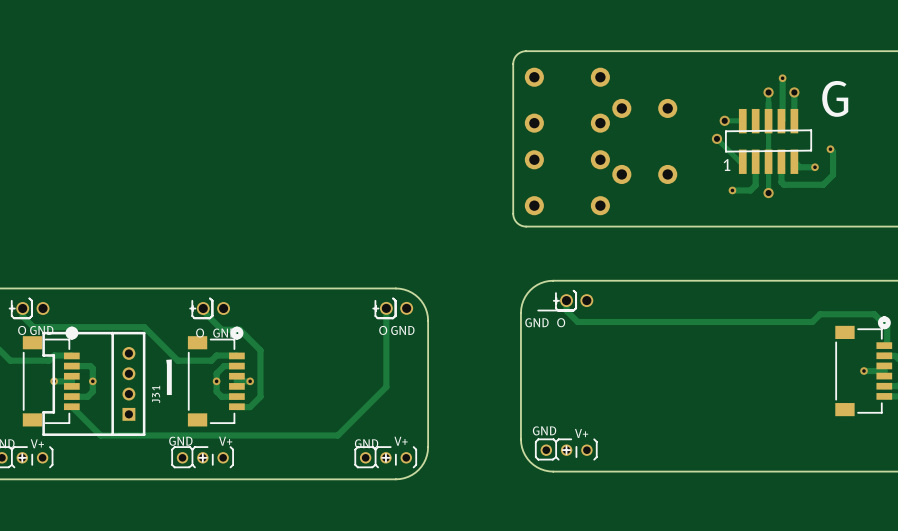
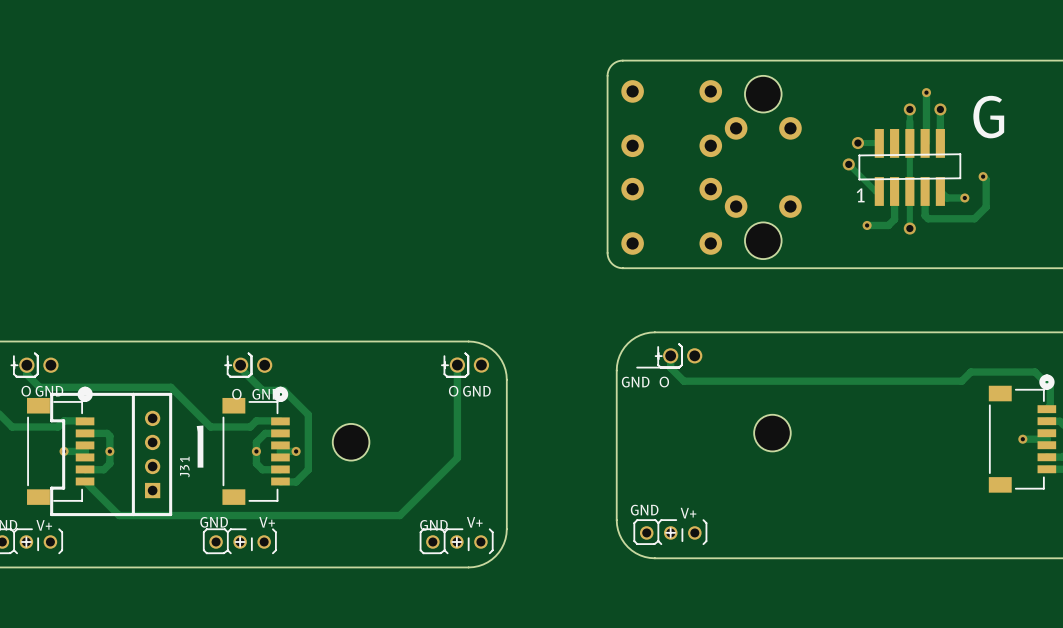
part: none -> (763, 94)
part: none -> (763, 240)
part: none -> (772, 433)
part: none -> (351, 442)

